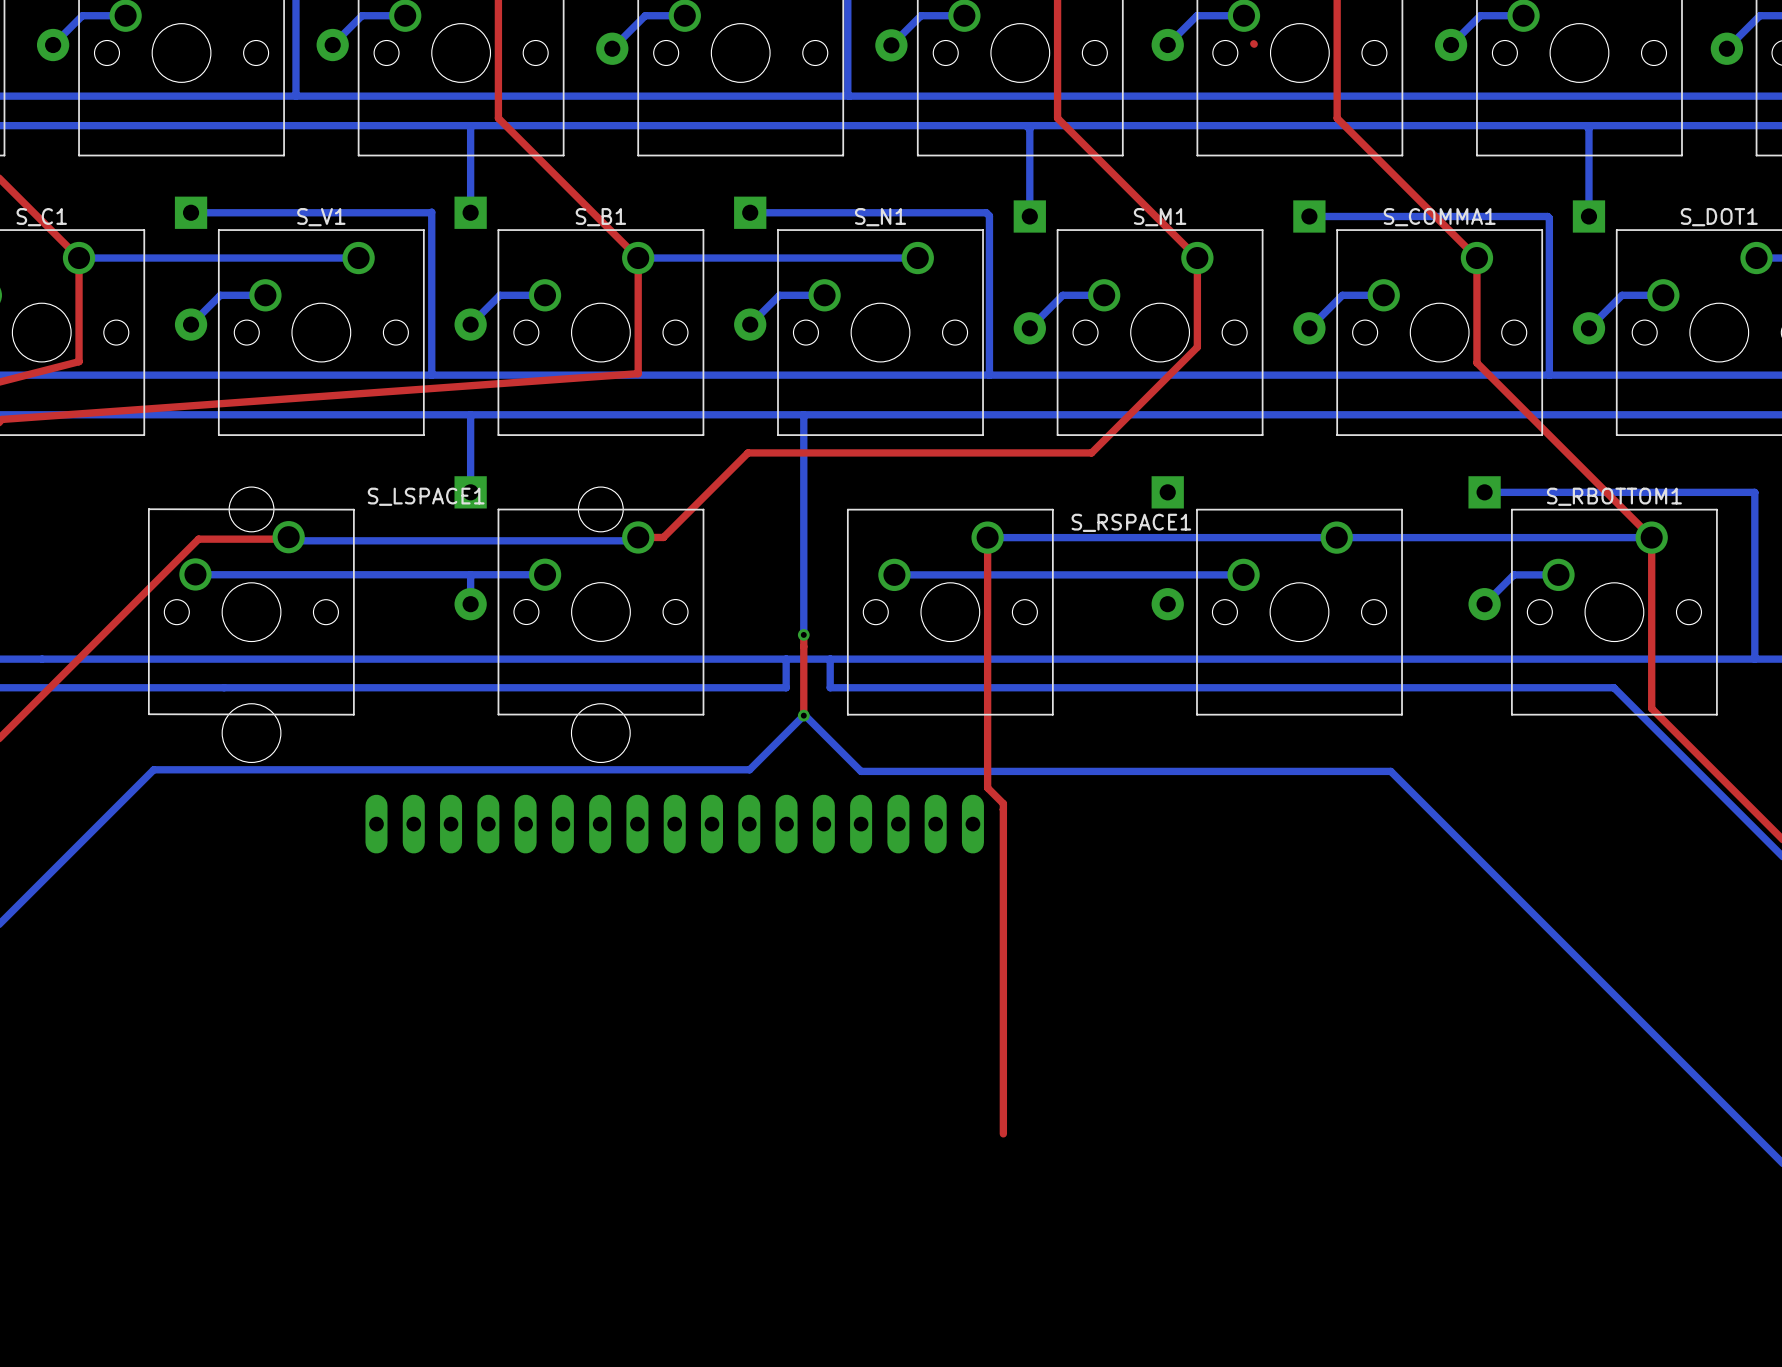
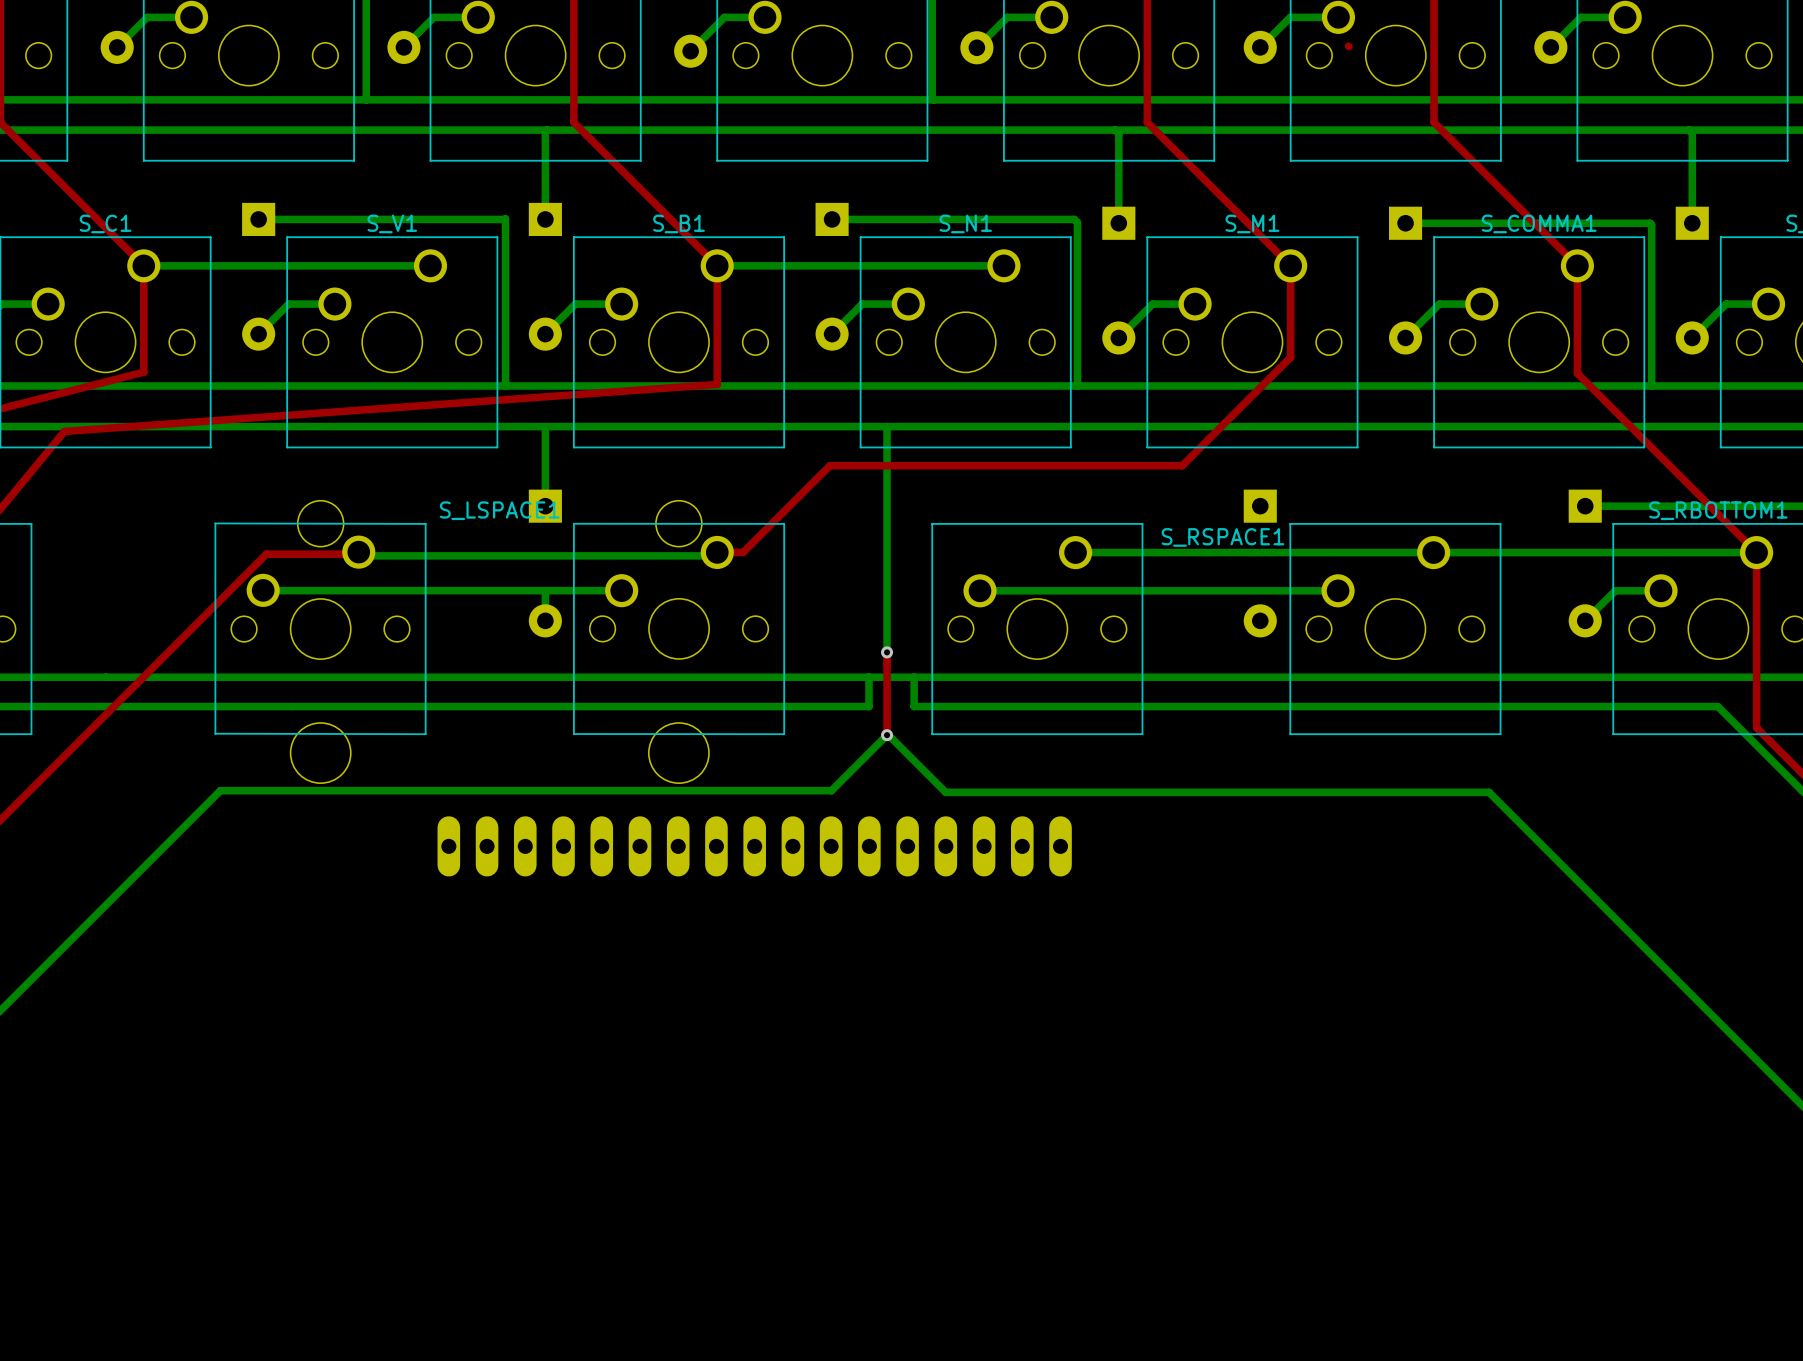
top track: (987, 537) (987, 787) (1003, 803) (1003, 1133) -> none

